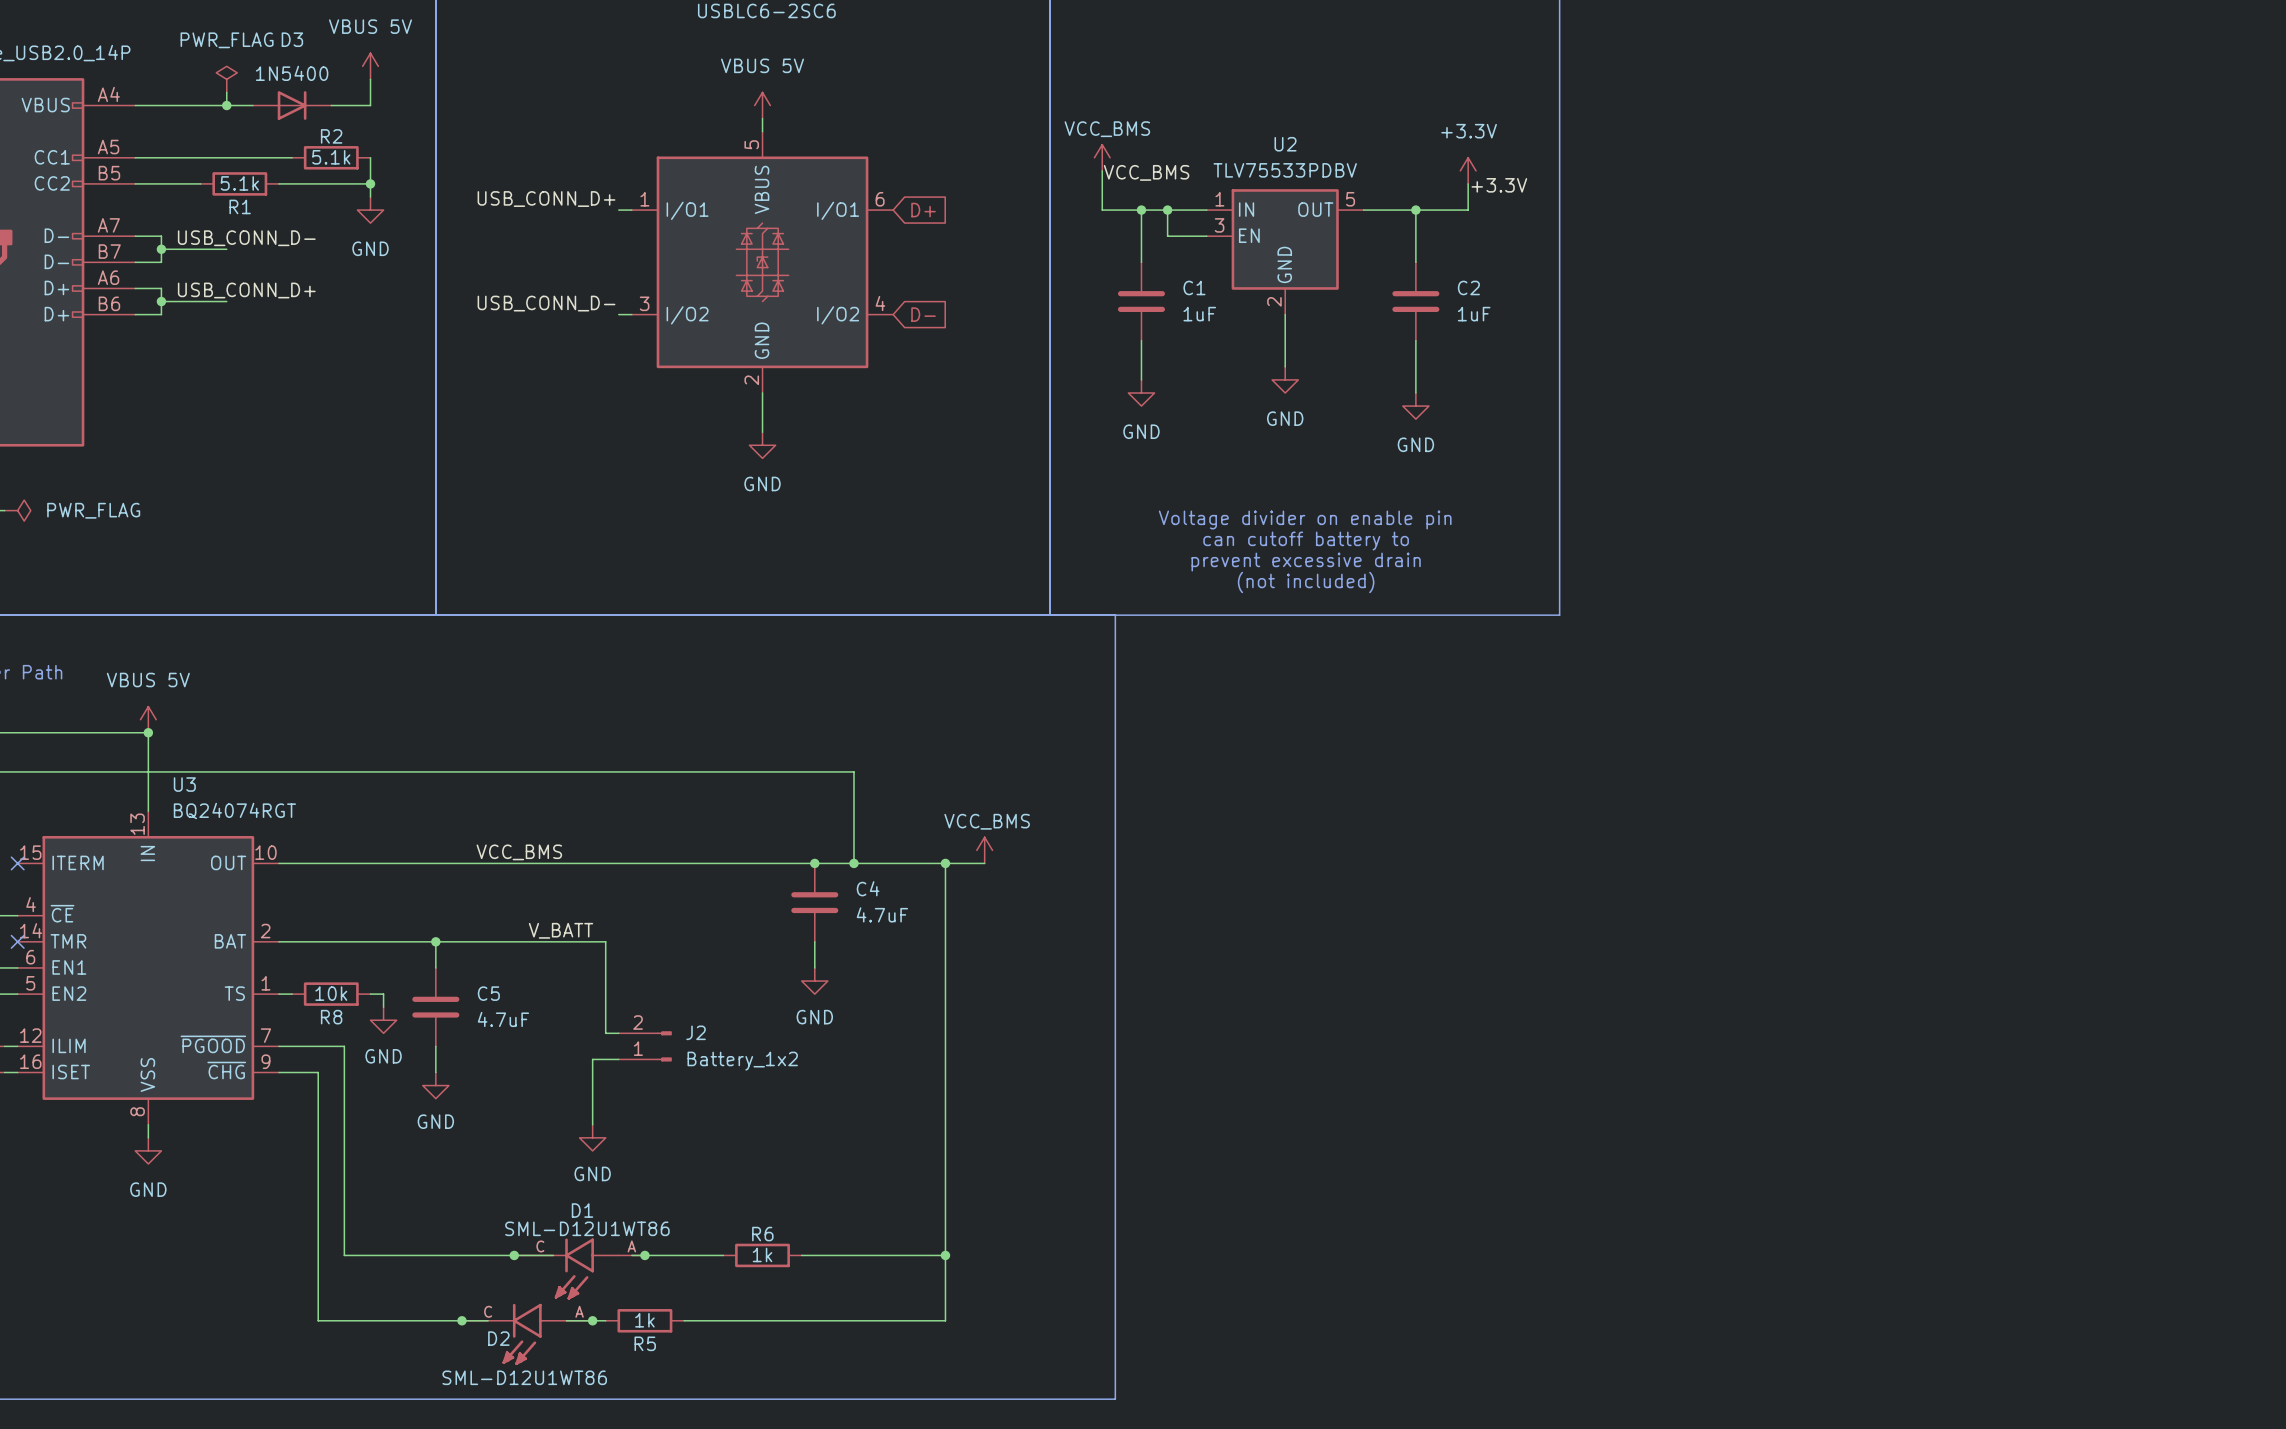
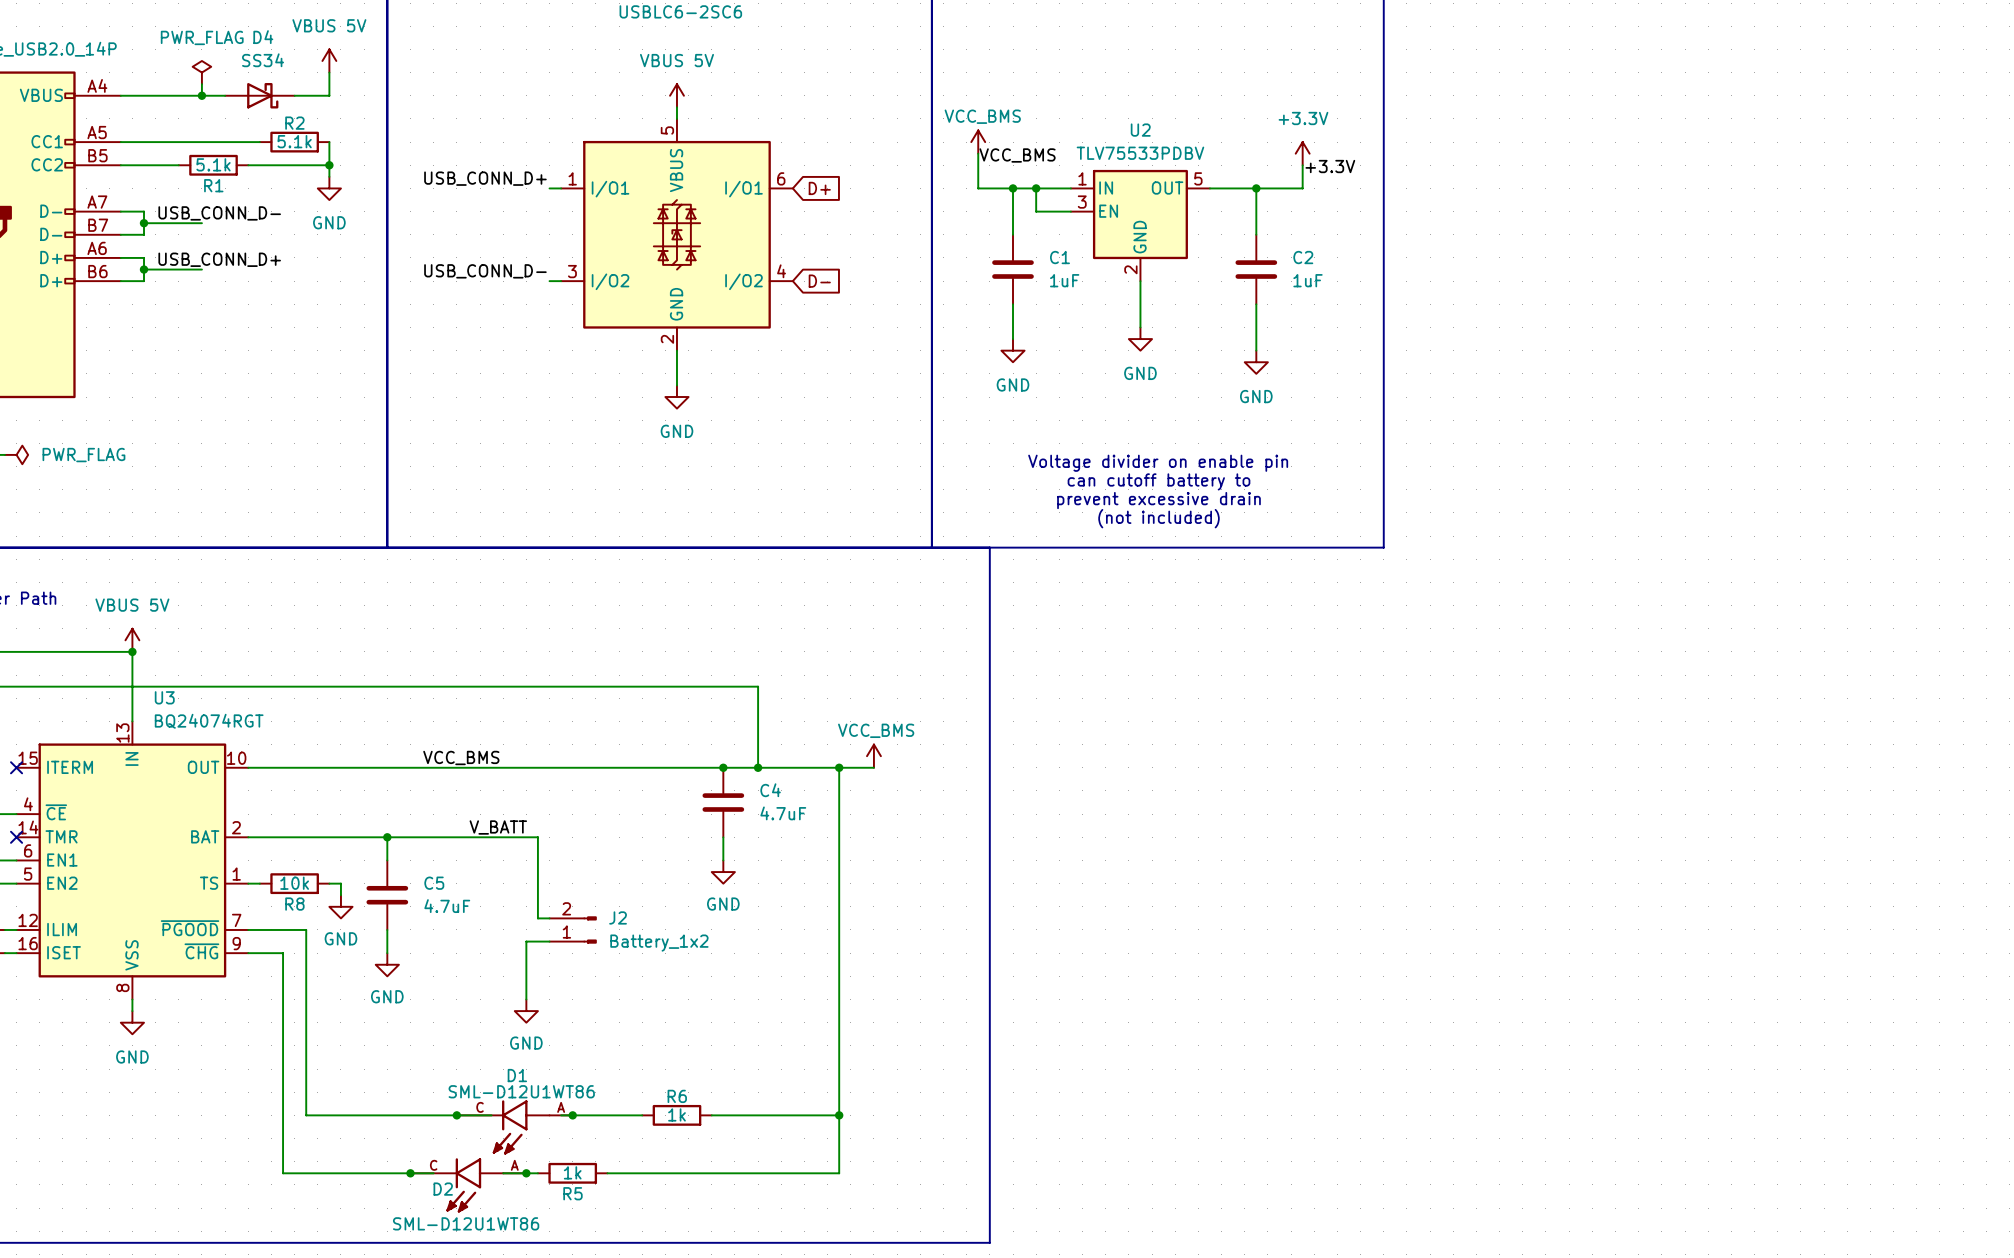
D3: 1N5400 (292, 105) -> none
D4: none -> SS34 (259, 95)

